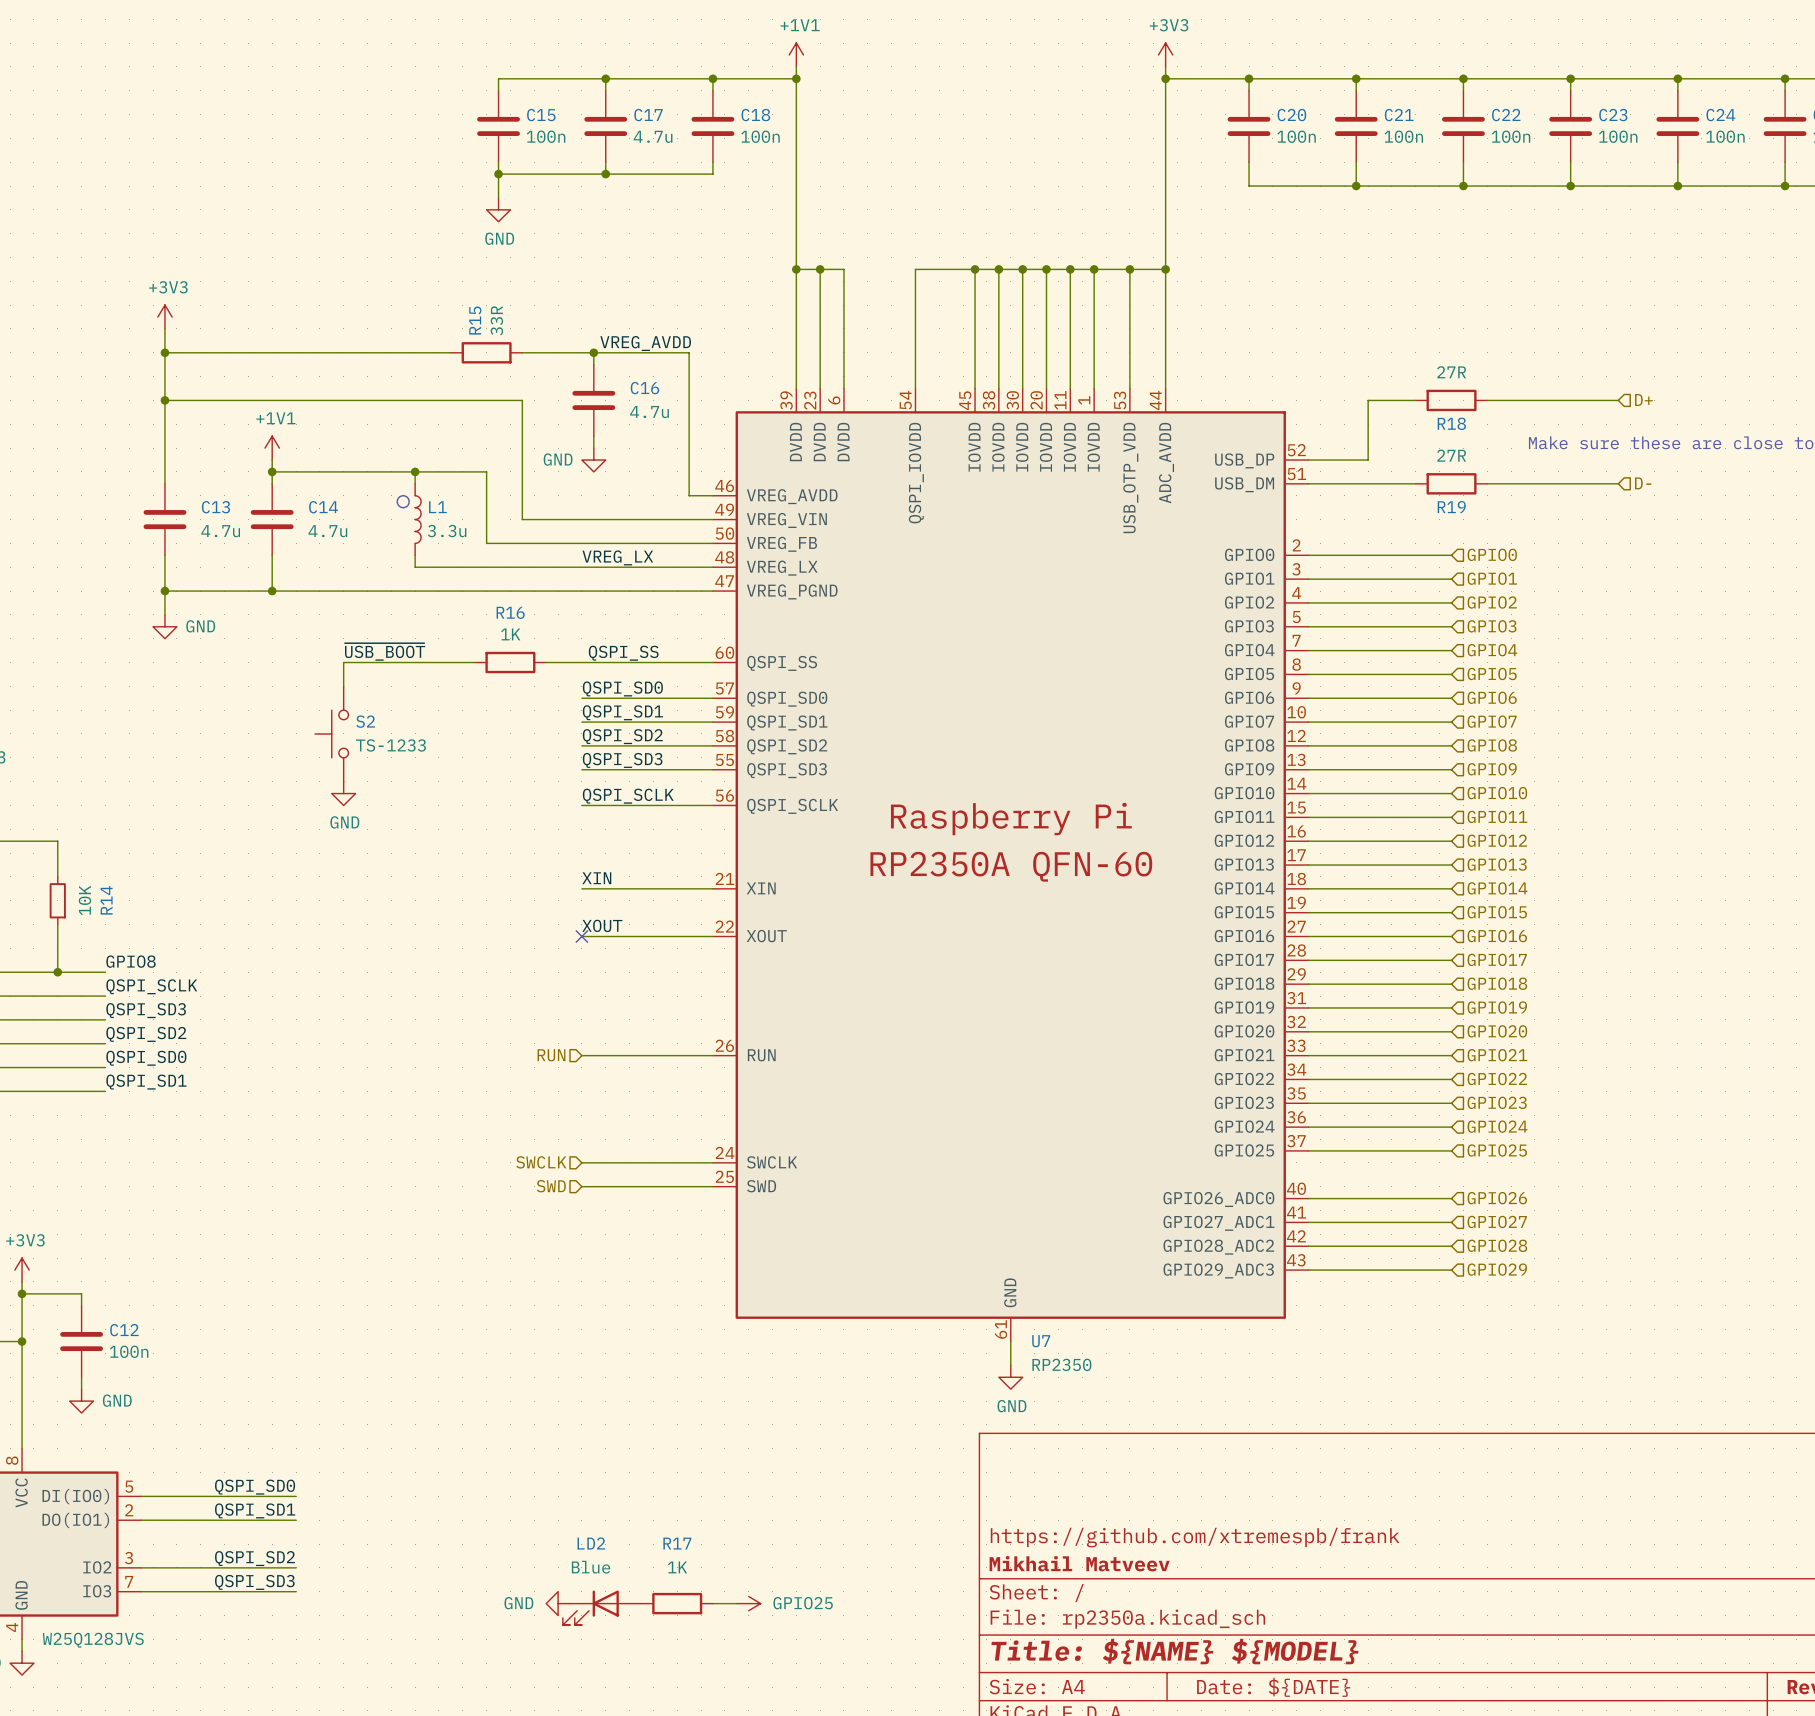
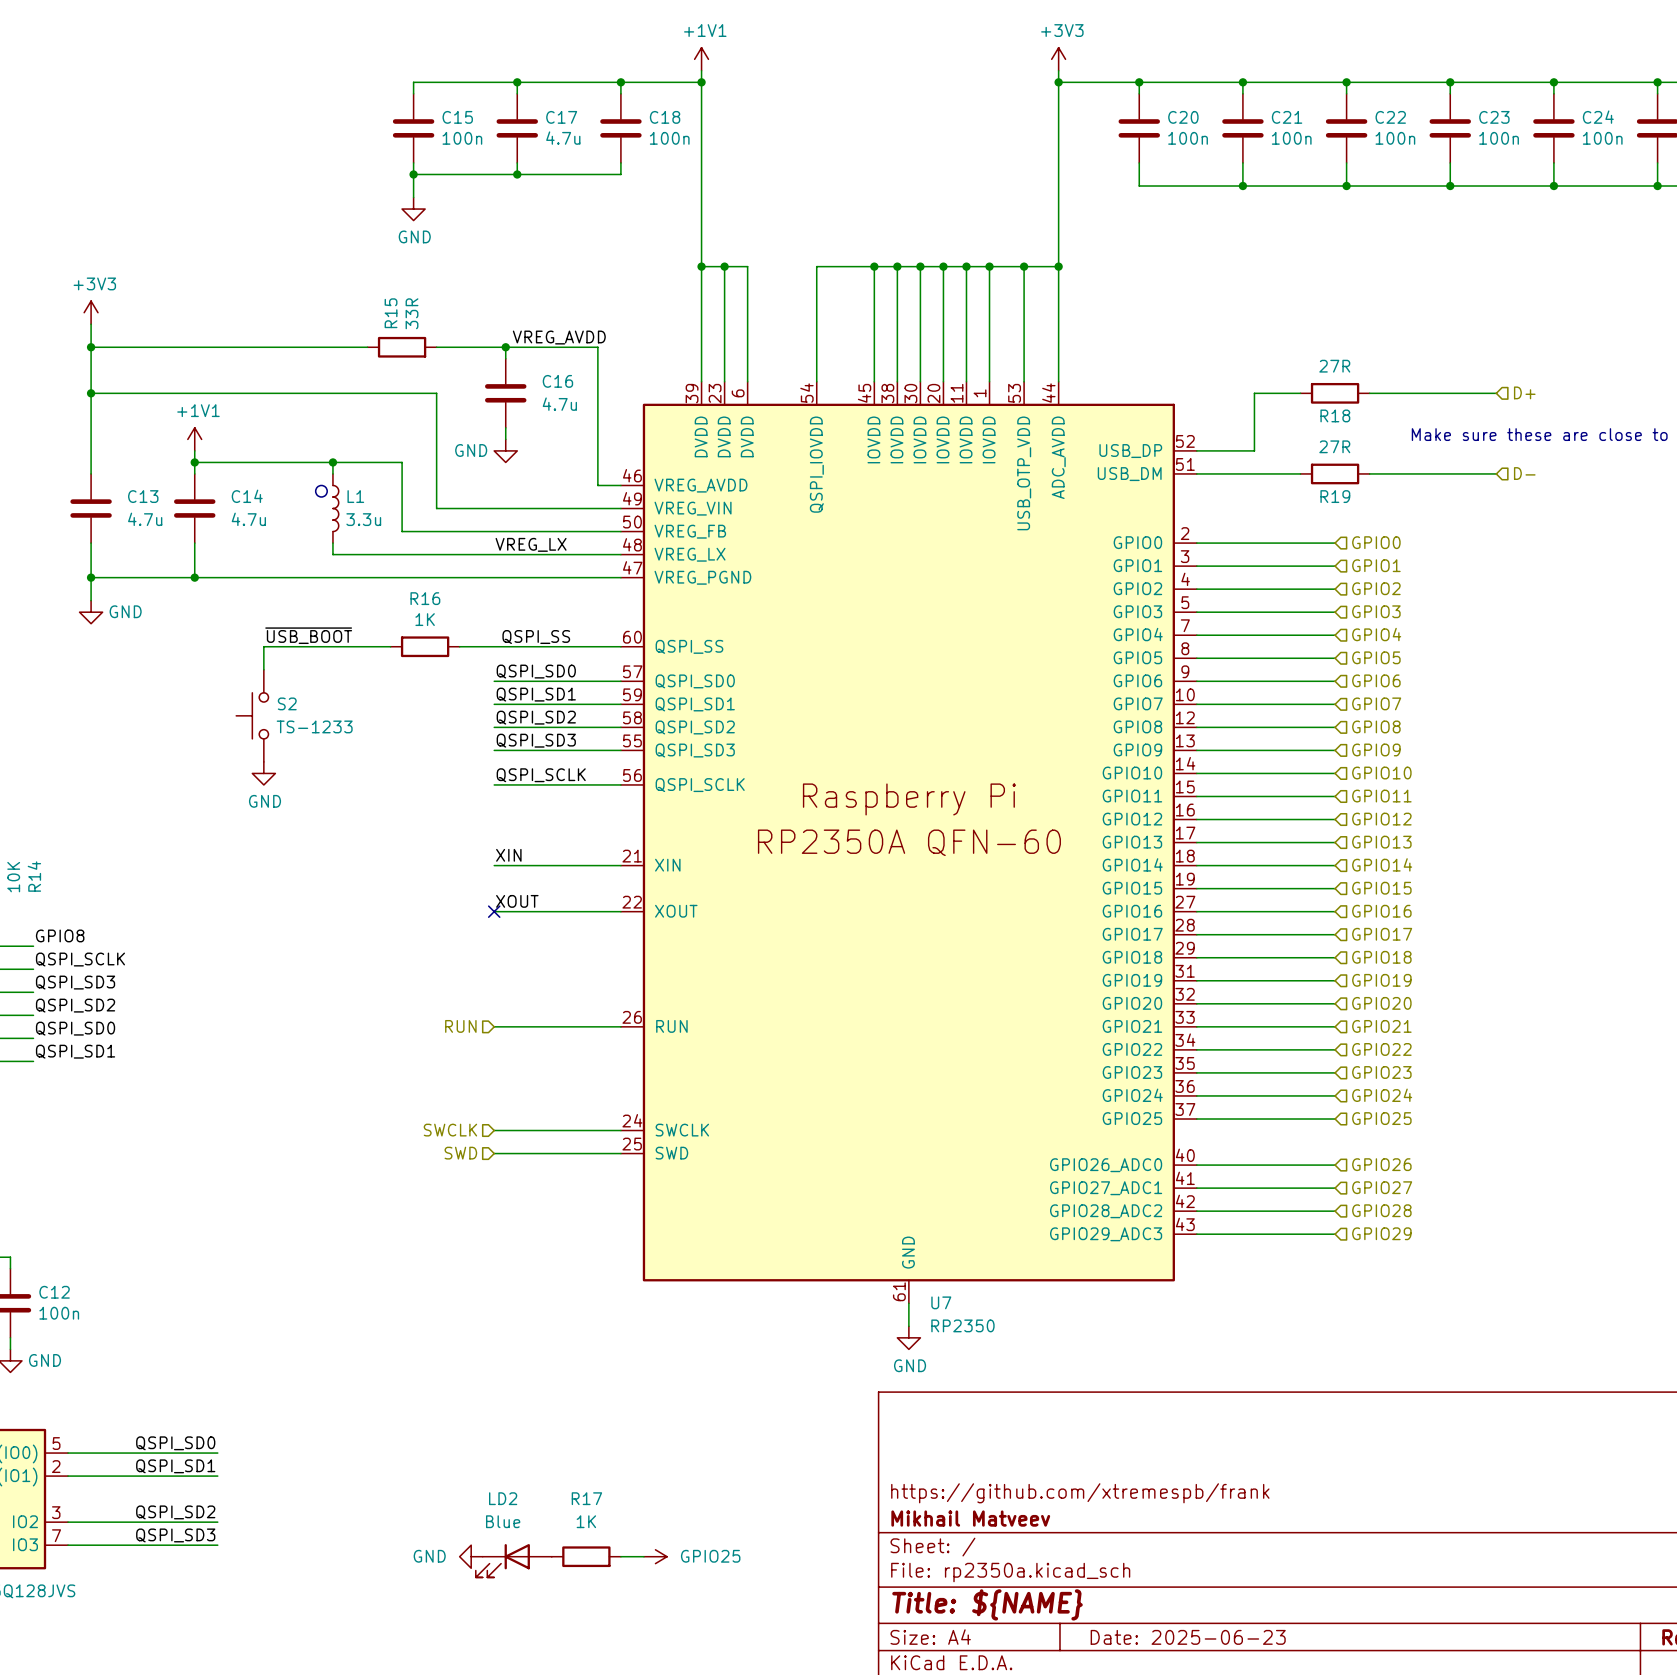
title block: Title: ${NAME} ${MODEL} (1174, 1651) -> Title: ${NAME} (987, 1604)
title block: Date: ${DATE} (1273, 1687) -> Date: 2025-06-23 (1188, 1637)

